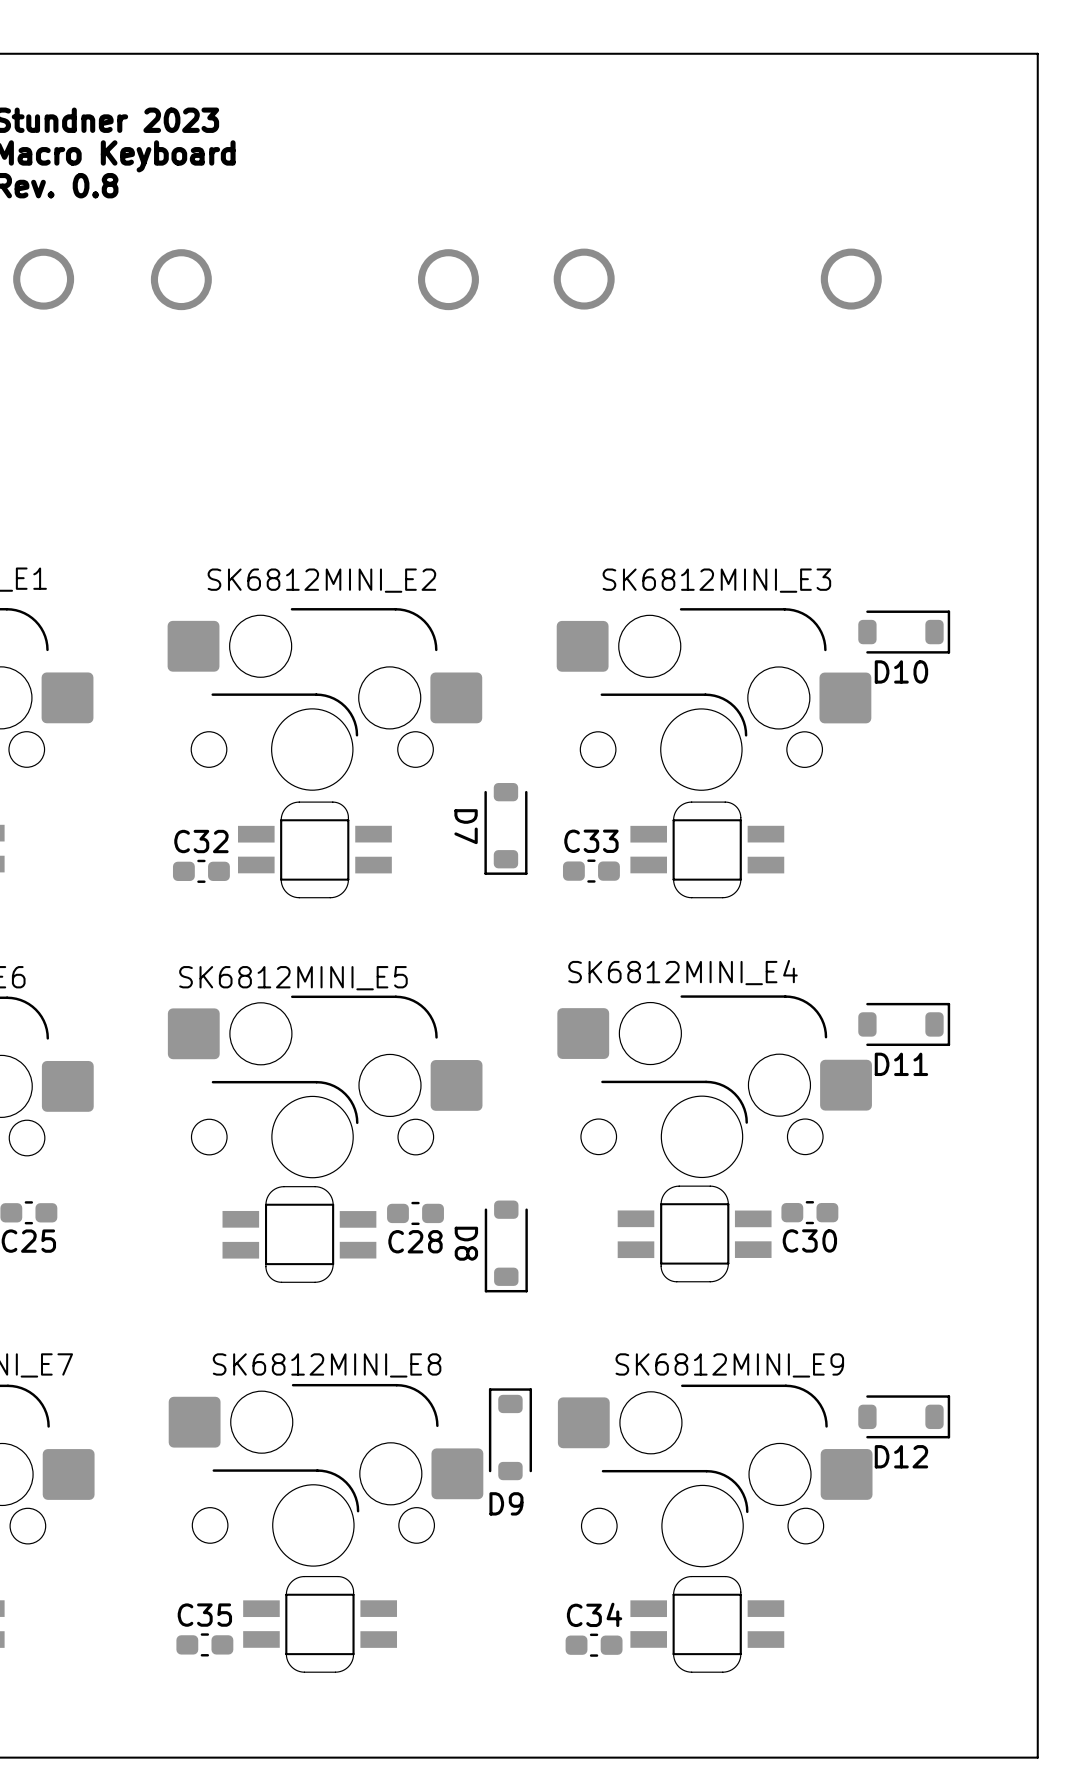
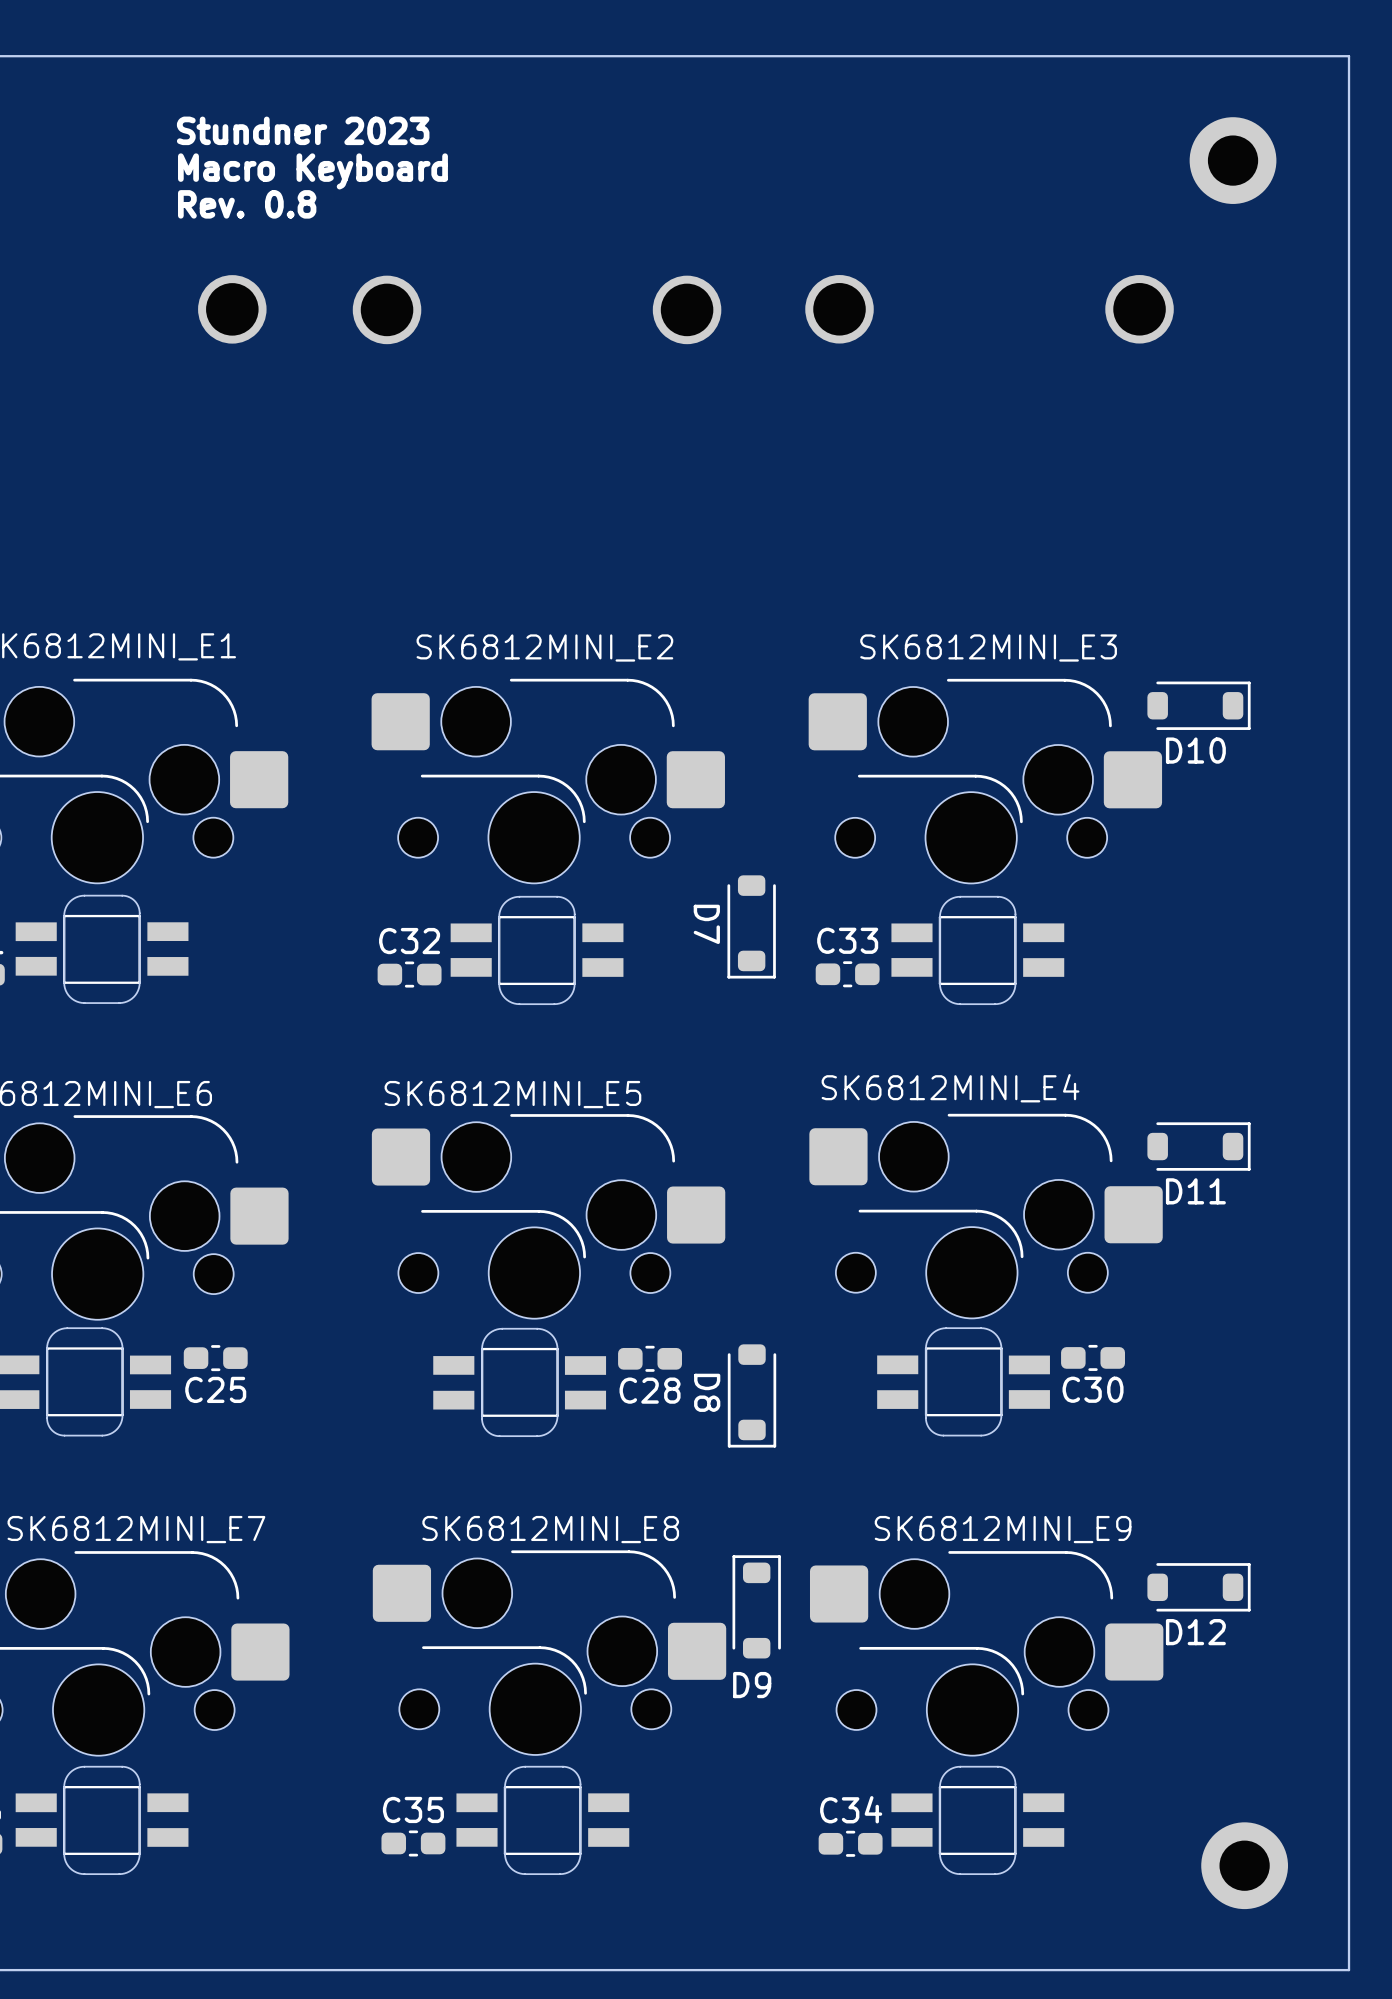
part: none -> (1233, 160)
part: none -> (1244, 1865)

